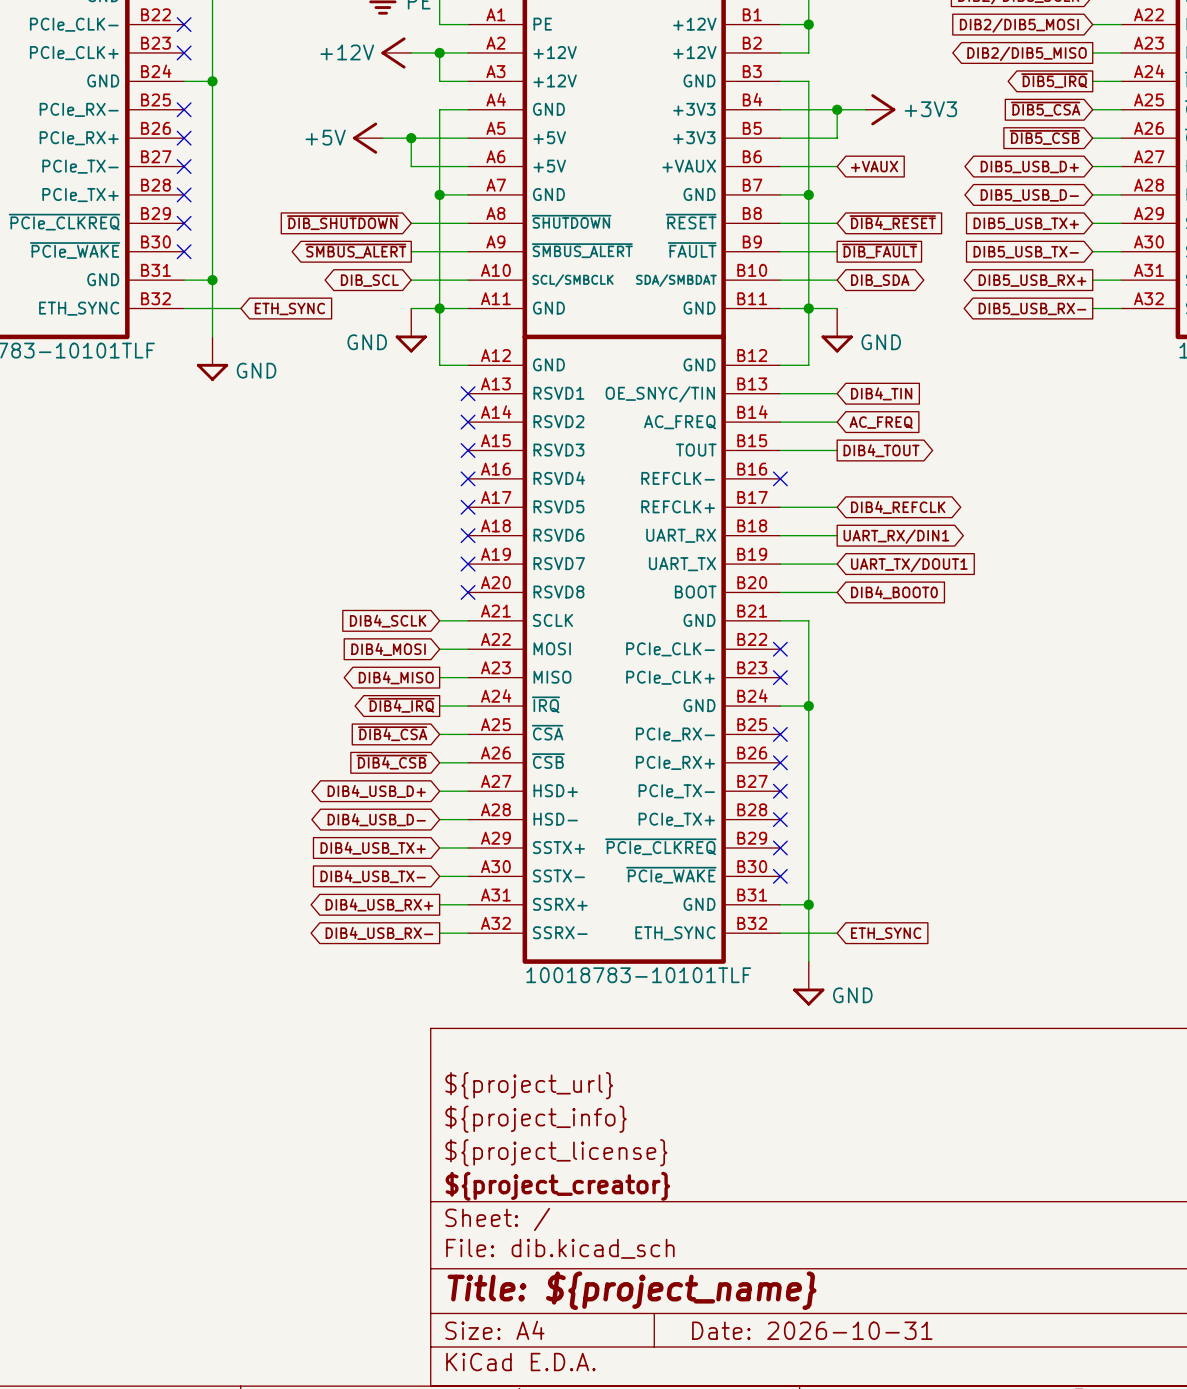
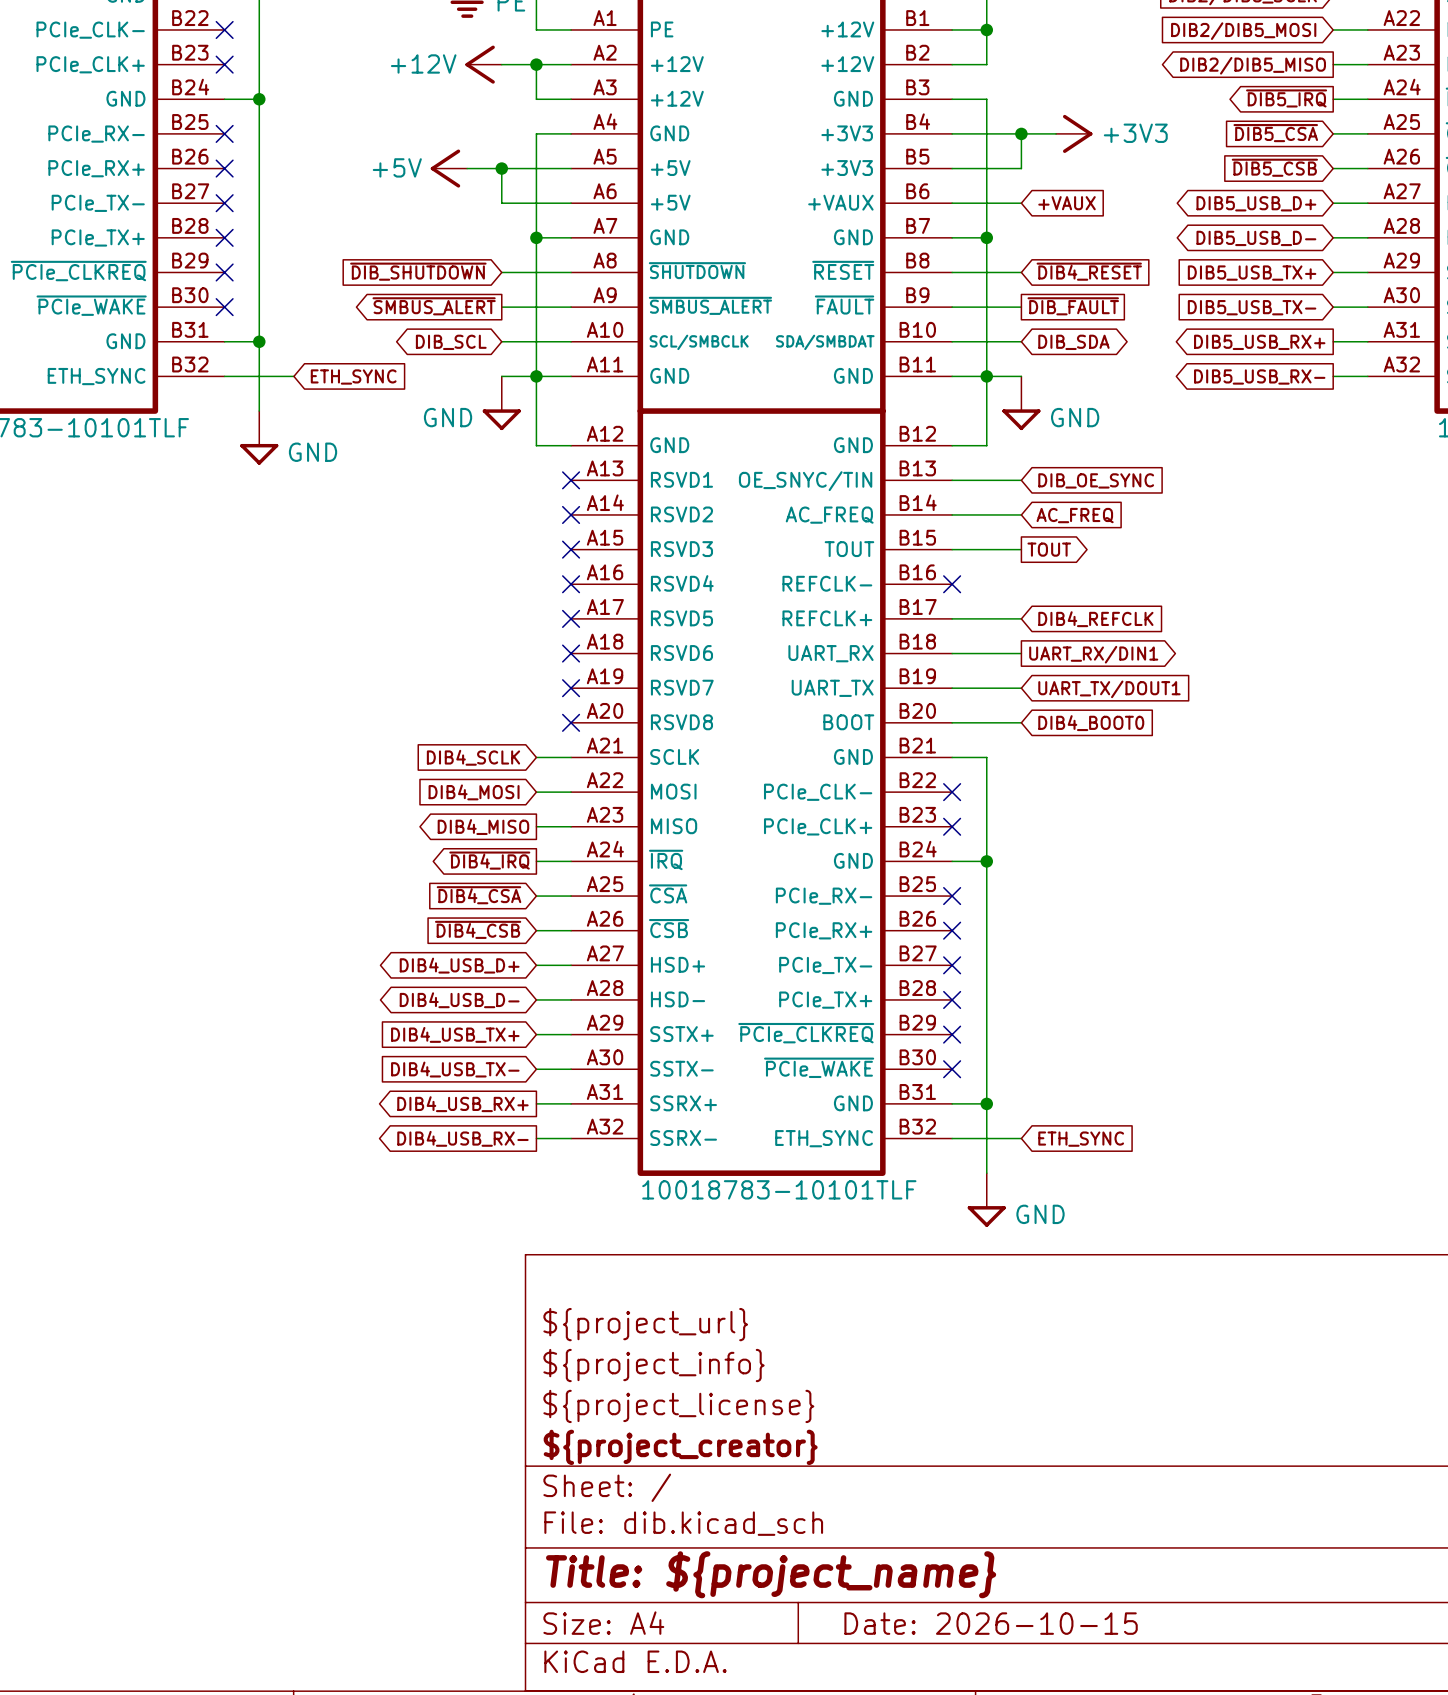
global label: DIB4_TIN (881, 393) -> DIB_OE_SYNC (1096, 480)
global label: DIB4_TOUT (881, 450) -> TOUT (1049, 549)
global label shape: bidirectional (898, 507) -> input (1095, 619)
title block: Date: 2026-10-31 (812, 1330) -> Date: 2026-10-15 (991, 1623)

